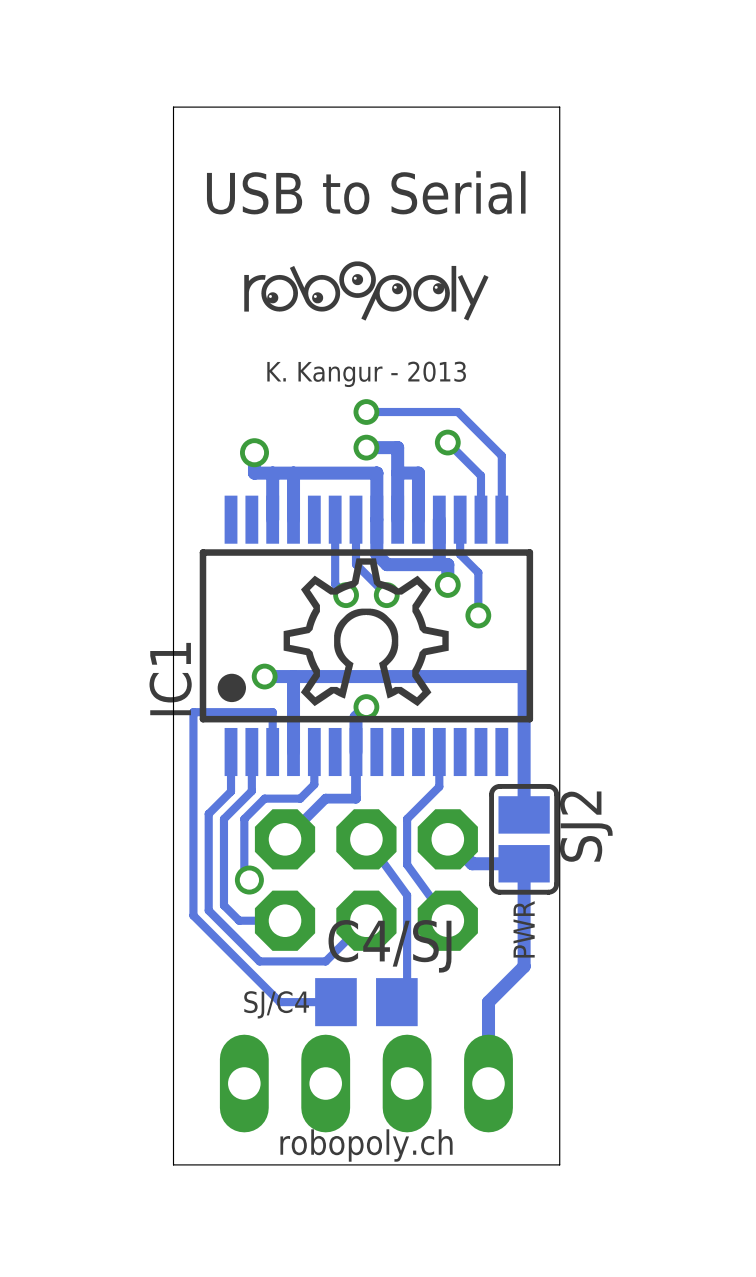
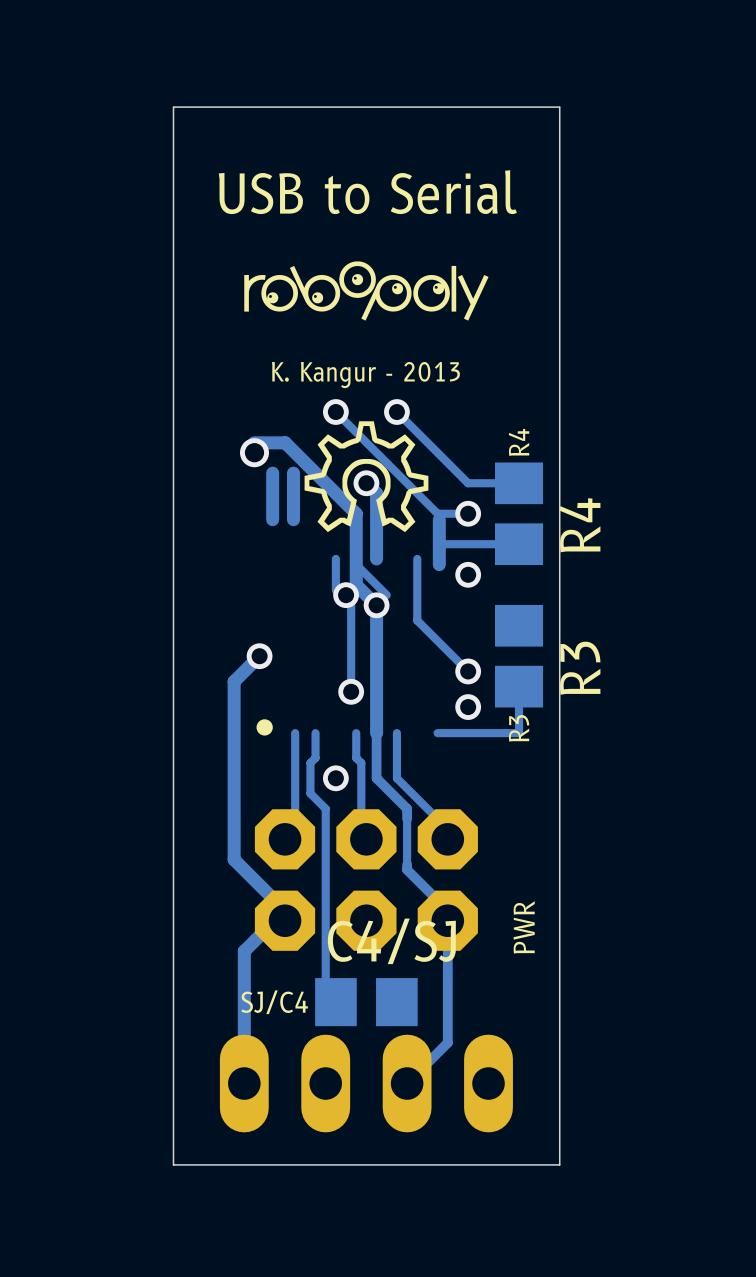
track: none -> (335, 412) (437, 513) (468, 513)
via: none -> (335, 412)
track: (366, 412) (457, 412) (501, 455) (501, 519) -> none
via: (366, 412) -> none
track: none -> (396, 412) (468, 483) (519, 483)
via: none -> (396, 412)
drawing: none -> [304, 421, 429, 533]
text: none -> R4 (519, 442)
track: (447, 442) (480, 475) (480, 519) -> none
via: (447, 442) -> none
track: (366, 447) (397, 447) (397, 519) -> none
via: (366, 447) -> none
track: (254, 452) (254, 473) (376, 473) (376, 554) (387, 564) (447, 564) (447, 584) -> none
track: (397, 473) (418, 473) (418, 519) -> none
track: none -> (366, 483) (376, 493) (376, 558)
via: none -> (366, 483)
via: none -> (468, 513)
R4: none -> (519, 513)
track: (335, 519) (335, 584) (346, 595) -> none
track: (460, 519) (460, 554) (478, 572) (478, 615) -> none
track: none -> (519, 544) (437, 544) (437, 558)
drawing: [283, 558, 449, 707] -> none
track: none -> (335, 558) (335, 590) (351, 605) (351, 691)
track: none -> (417, 558) (417, 620) (468, 671)
via position: (447, 584) -> (468, 574)
via position: (386, 595) -> (376, 605)
via: (478, 615) -> none
IC1: (366, 635) -> none
track: none -> (259, 656) (234, 681) (234, 859) (285, 910) (244, 951) (244, 1083)
R3: none -> (519, 656)
via: none -> (468, 671)
track: (264, 676) (524, 676) (524, 814) -> none
via position: (264, 676) -> (259, 656)
track: (293, 676) (293, 752) -> none
track: none -> (519, 686) (519, 733) (437, 733)
track: (366, 707) (356, 717) (356, 798) (325, 798) (285, 839) -> none
via position: (366, 707) -> (351, 691)
via: none -> (468, 707)
drawing: none -> [256, 719, 273, 736]
text: none -> R3 (519, 728)
track: none -> (295, 733) (295, 818) (285, 829)
track: none -> (315, 733) (315, 757) (310, 763) (310, 793) (325, 808) (325, 986) (335, 986)
track: none -> (356, 733) (356, 757) (361, 763) (361, 824) (366, 829)
track: none -> (396, 733) (396, 778) (447, 829)
track: (231, 752) (231, 791) (208, 813) (208, 910) (259, 961) (325, 961) (366, 920) -> none
track: (251, 752) (251, 791) (223, 818) (223, 905) (239, 920) (285, 920) -> none
track: (272, 752) (272, 712) (193, 712) (193, 915) (279, 1002) (335, 1002) -> none
track: (314, 752) (314, 784) (300, 798) (264, 798) (244, 818) (244, 874) (249, 880) -> none
track: (439, 752) (439, 786) (407, 818) -> (254, 442) (285, 442) (356, 513) (356, 584) (376, 605) (376, 778) (407, 808) (407, 818)
via: none -> (335, 778)
track: (366, 839) (407, 895) (407, 1002) (396, 1002) -> none
track: (447, 839) (472, 863) (524, 863) (524, 966) (488, 1002) (488, 1083) -> none
SJ2: (524, 839) -> none
track: (407, 864) (447, 920) -> (407, 864) (407, 869) (447, 910) (447, 1042) (407, 1083)
via: (249, 880) -> none
text: robopoly.ch (366, 1145) -> none

